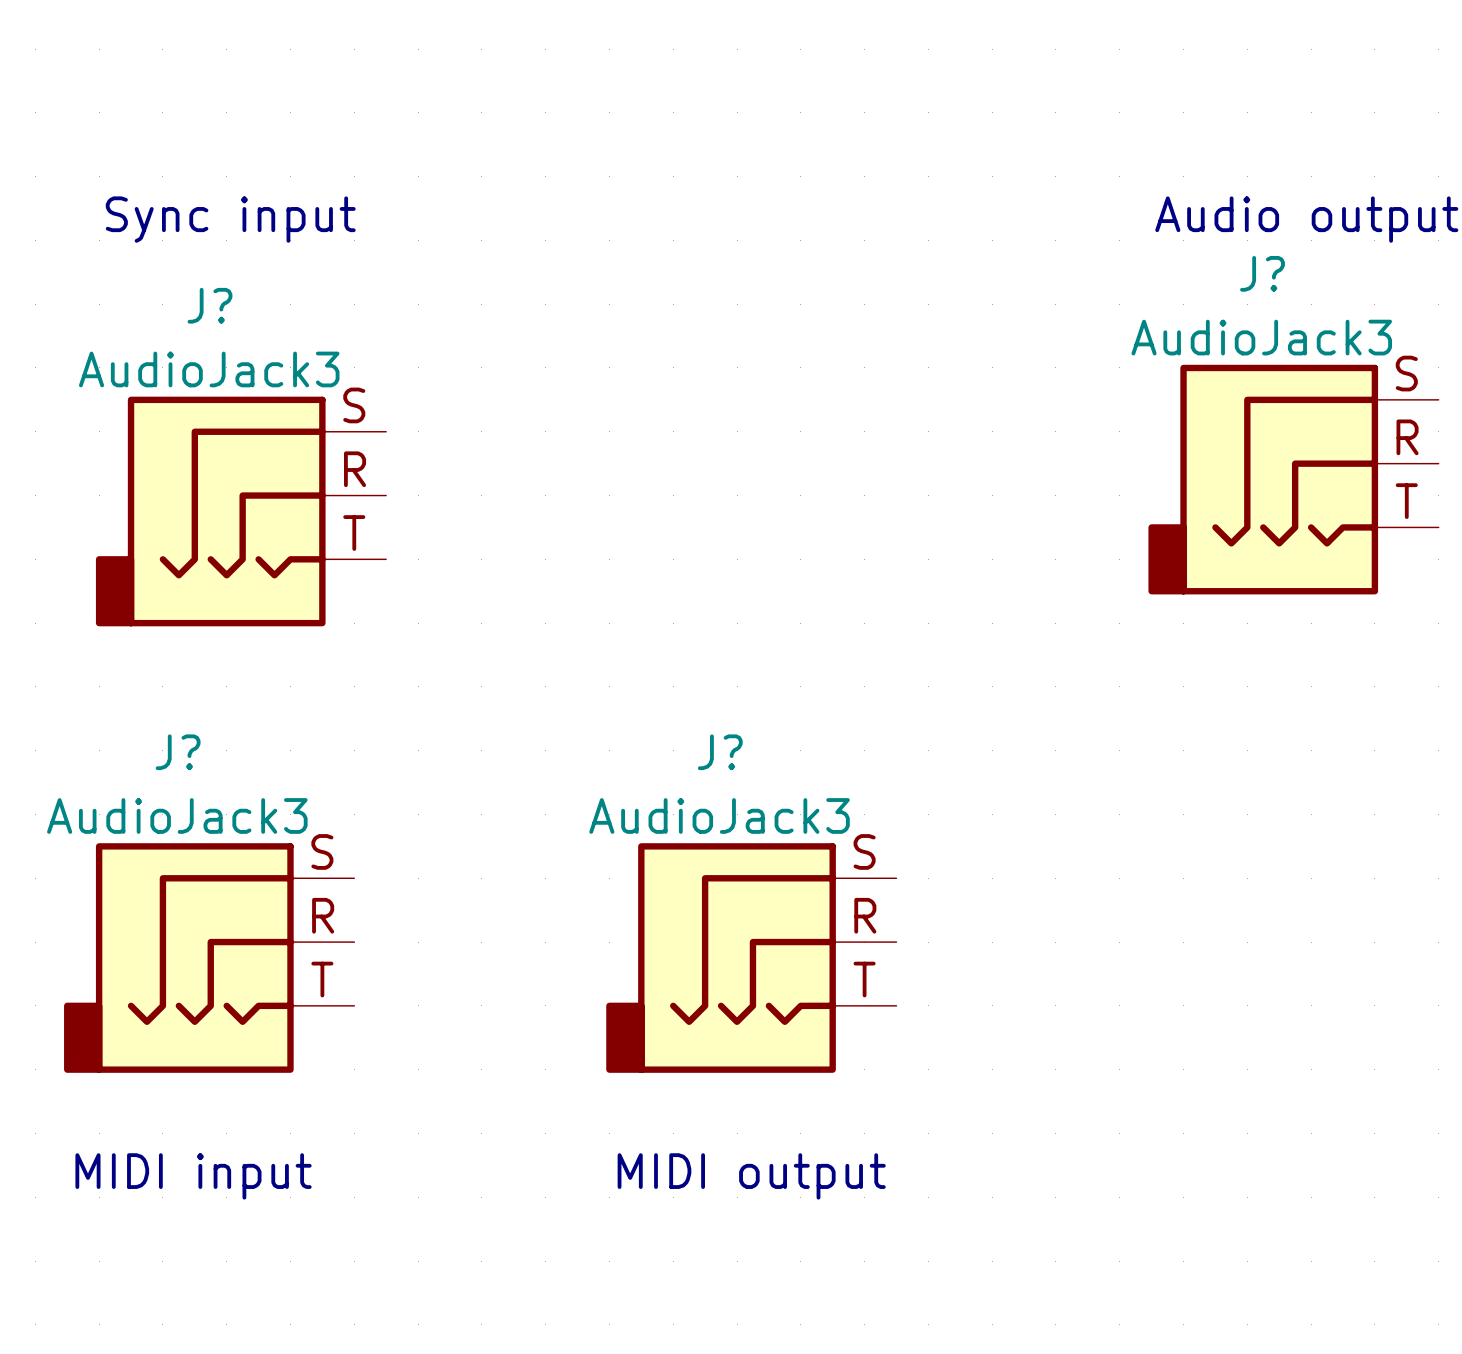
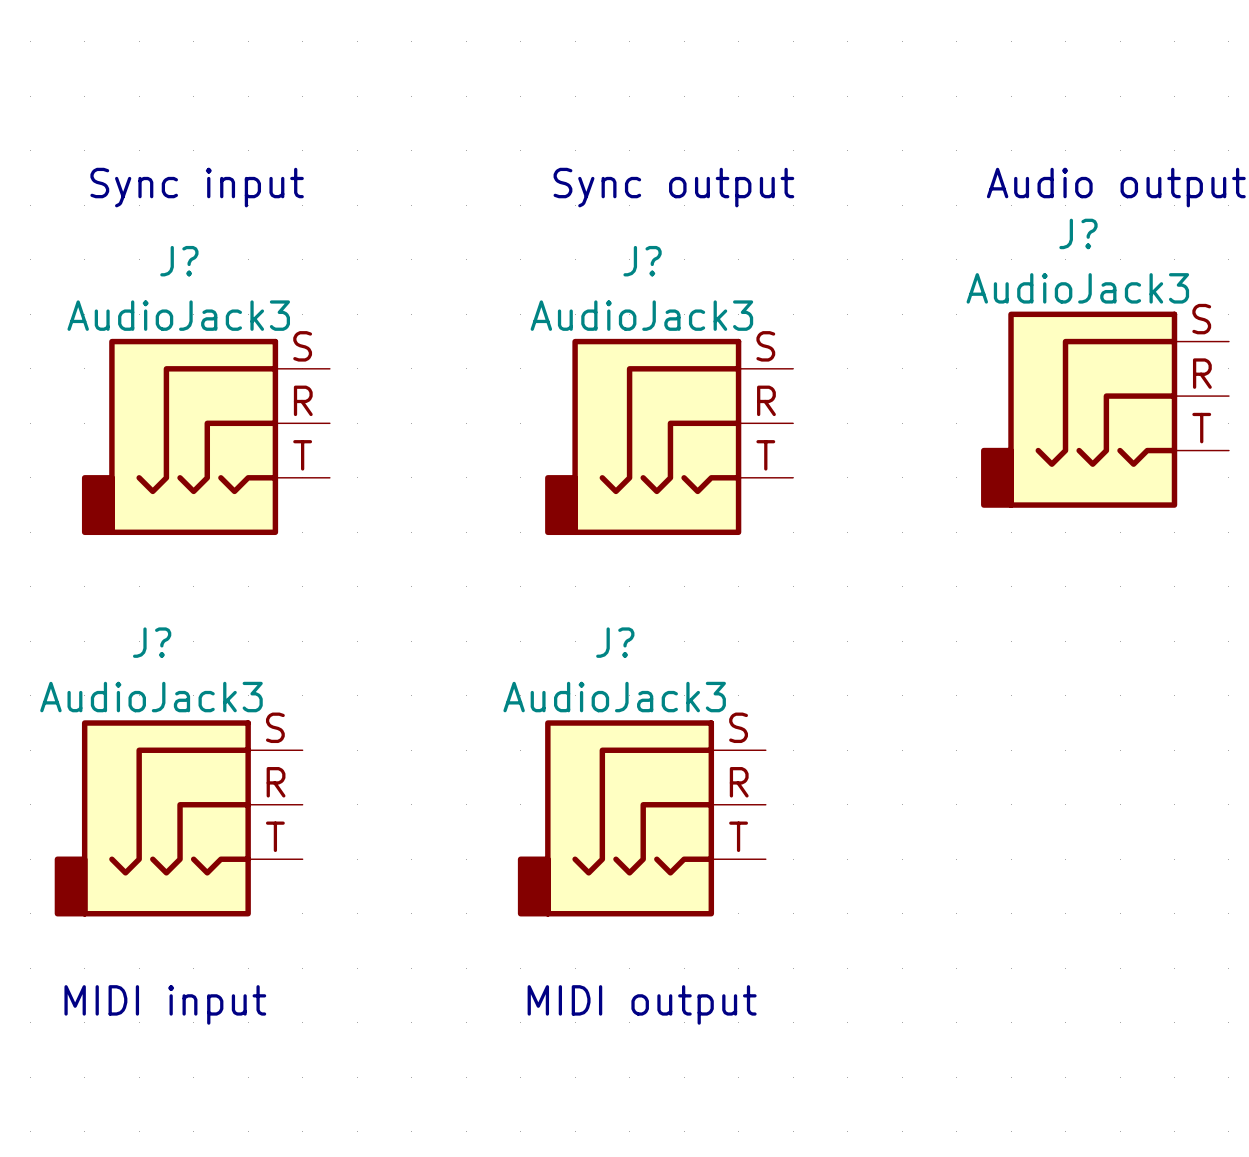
text: none -> Sync output (673, 187)
J?: none -> AudioJack3 (669, 436)

